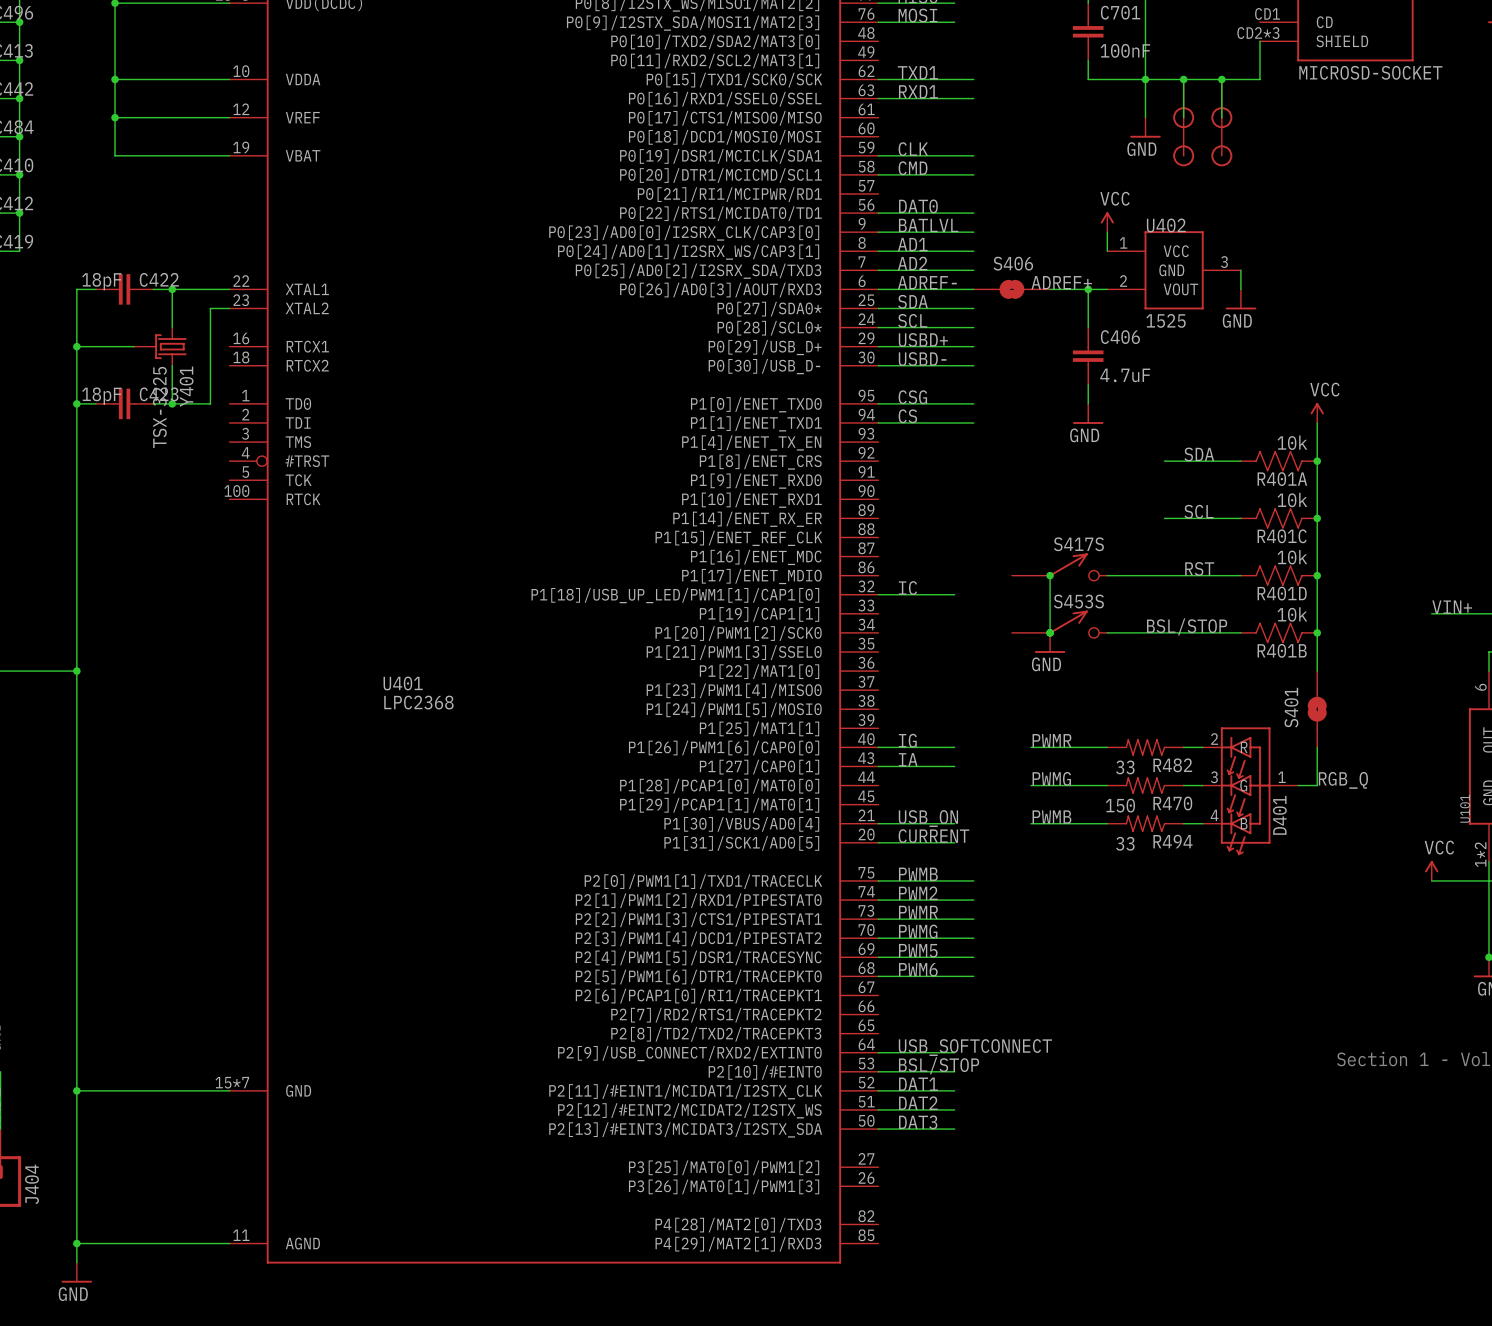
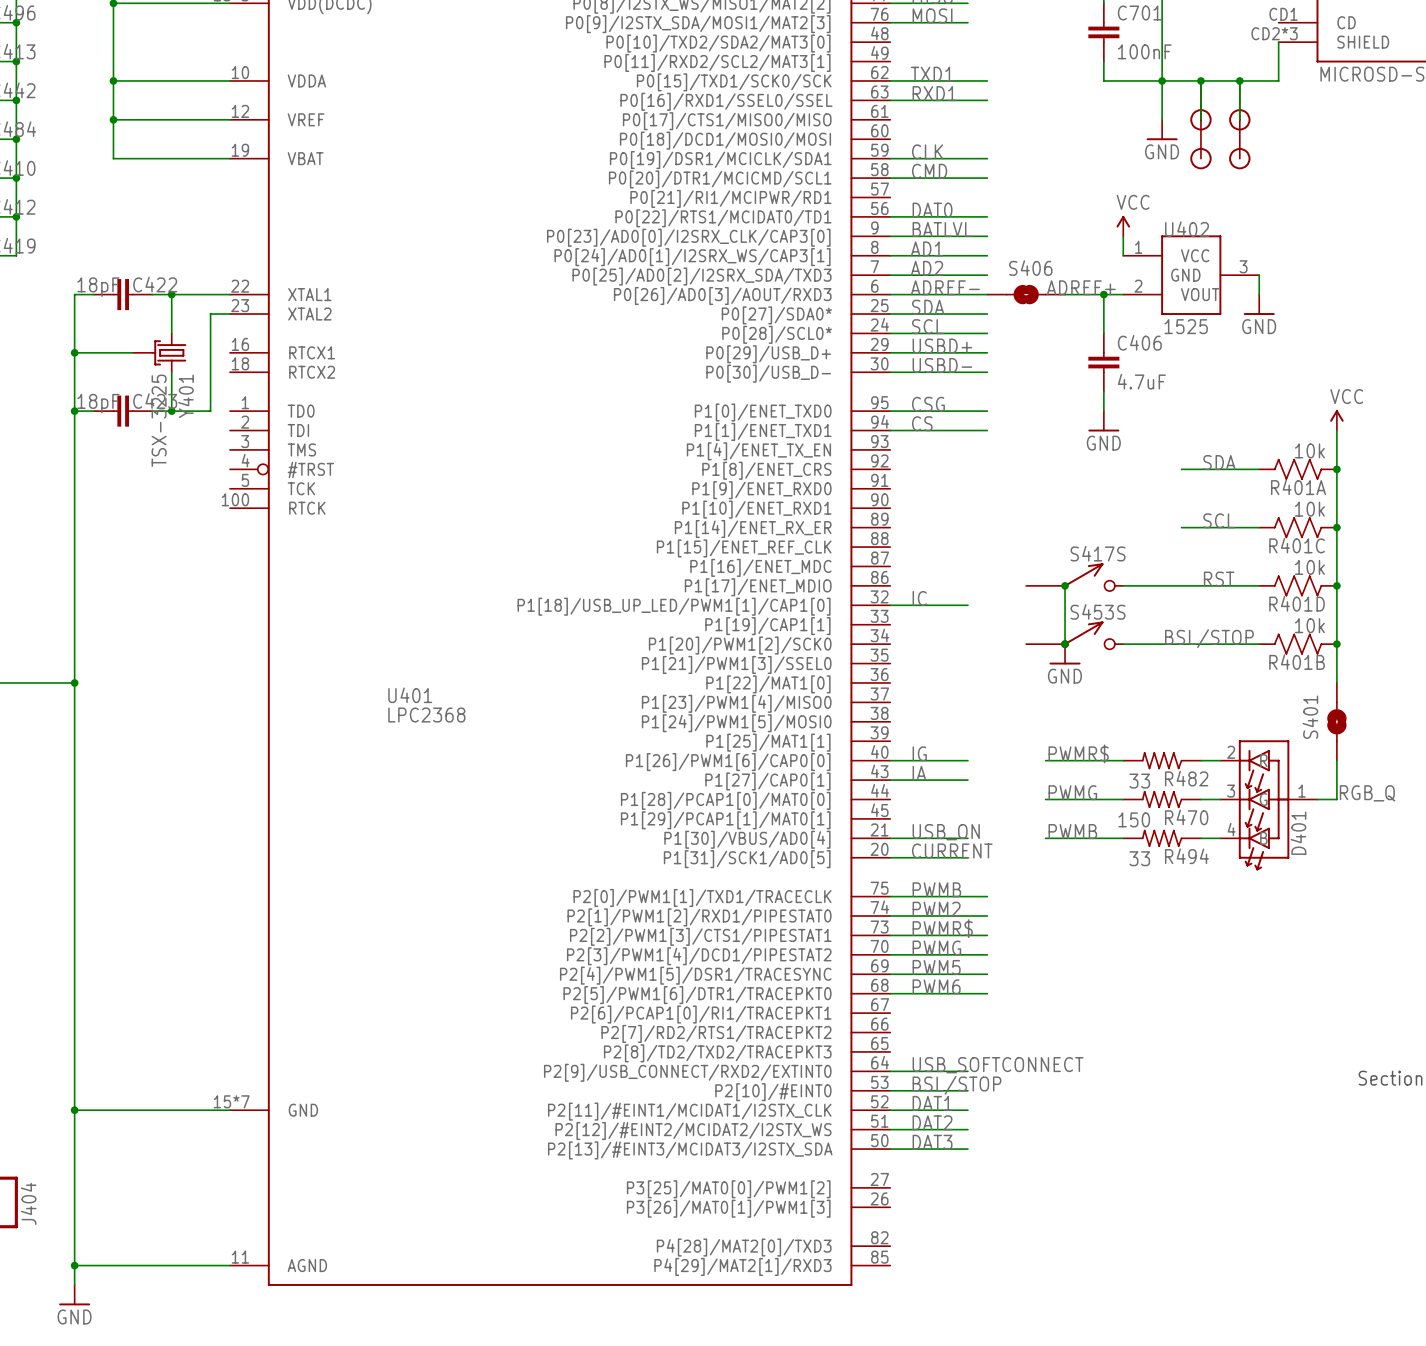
label: PWMR (1052, 740) -> PWMR$ (1078, 753)
label: PWMR (918, 912) -> PWMR$ (942, 928)

